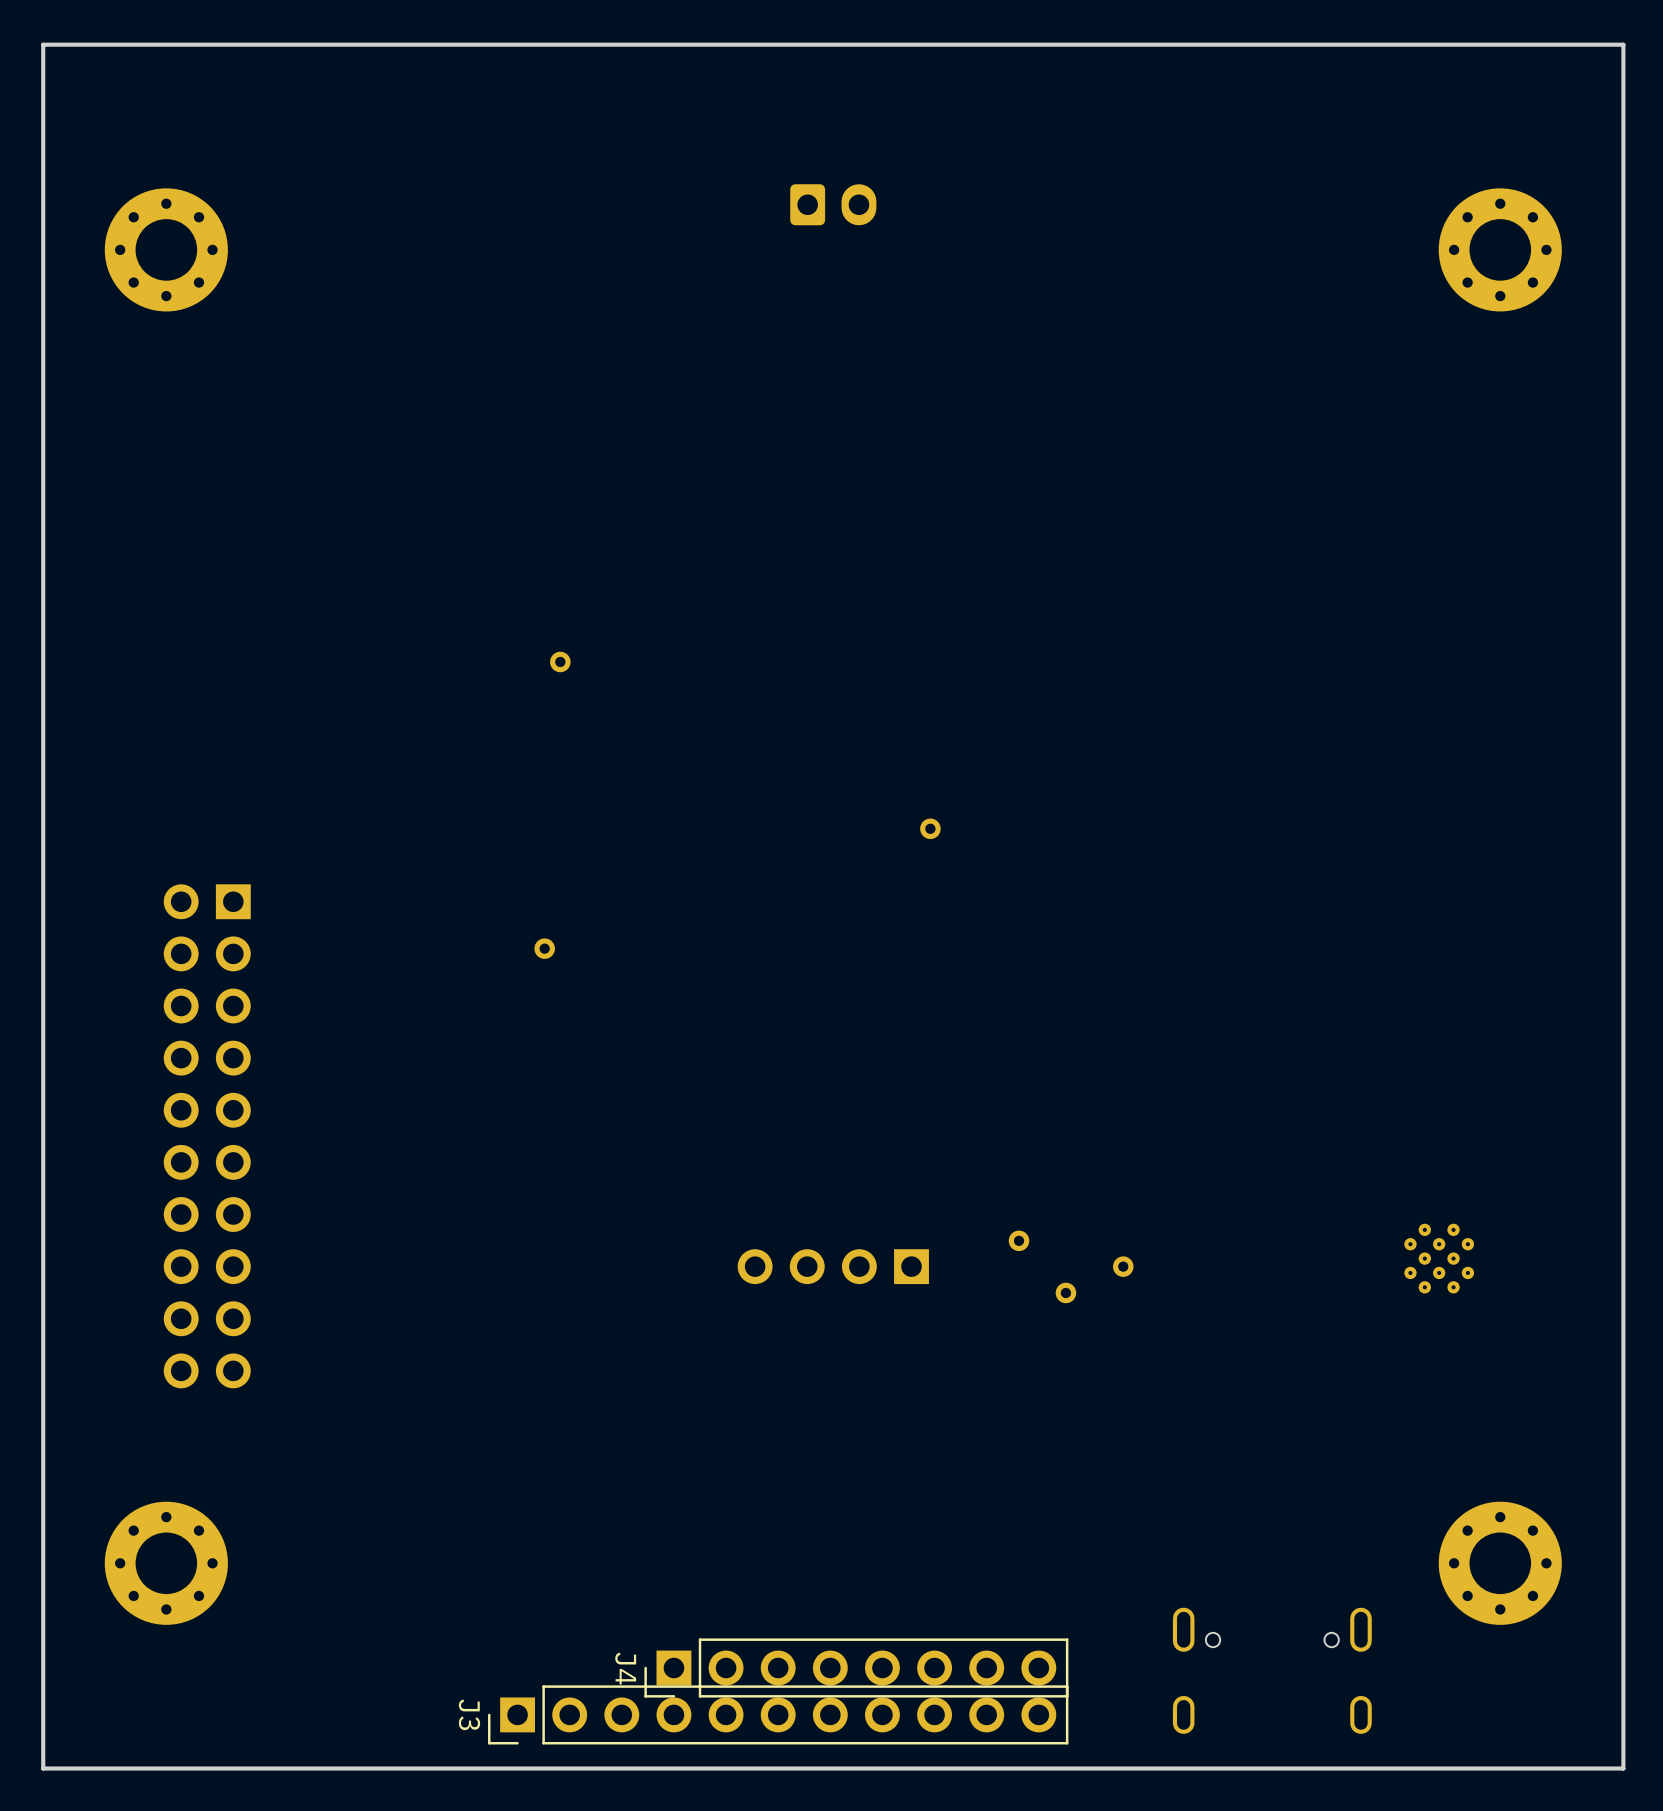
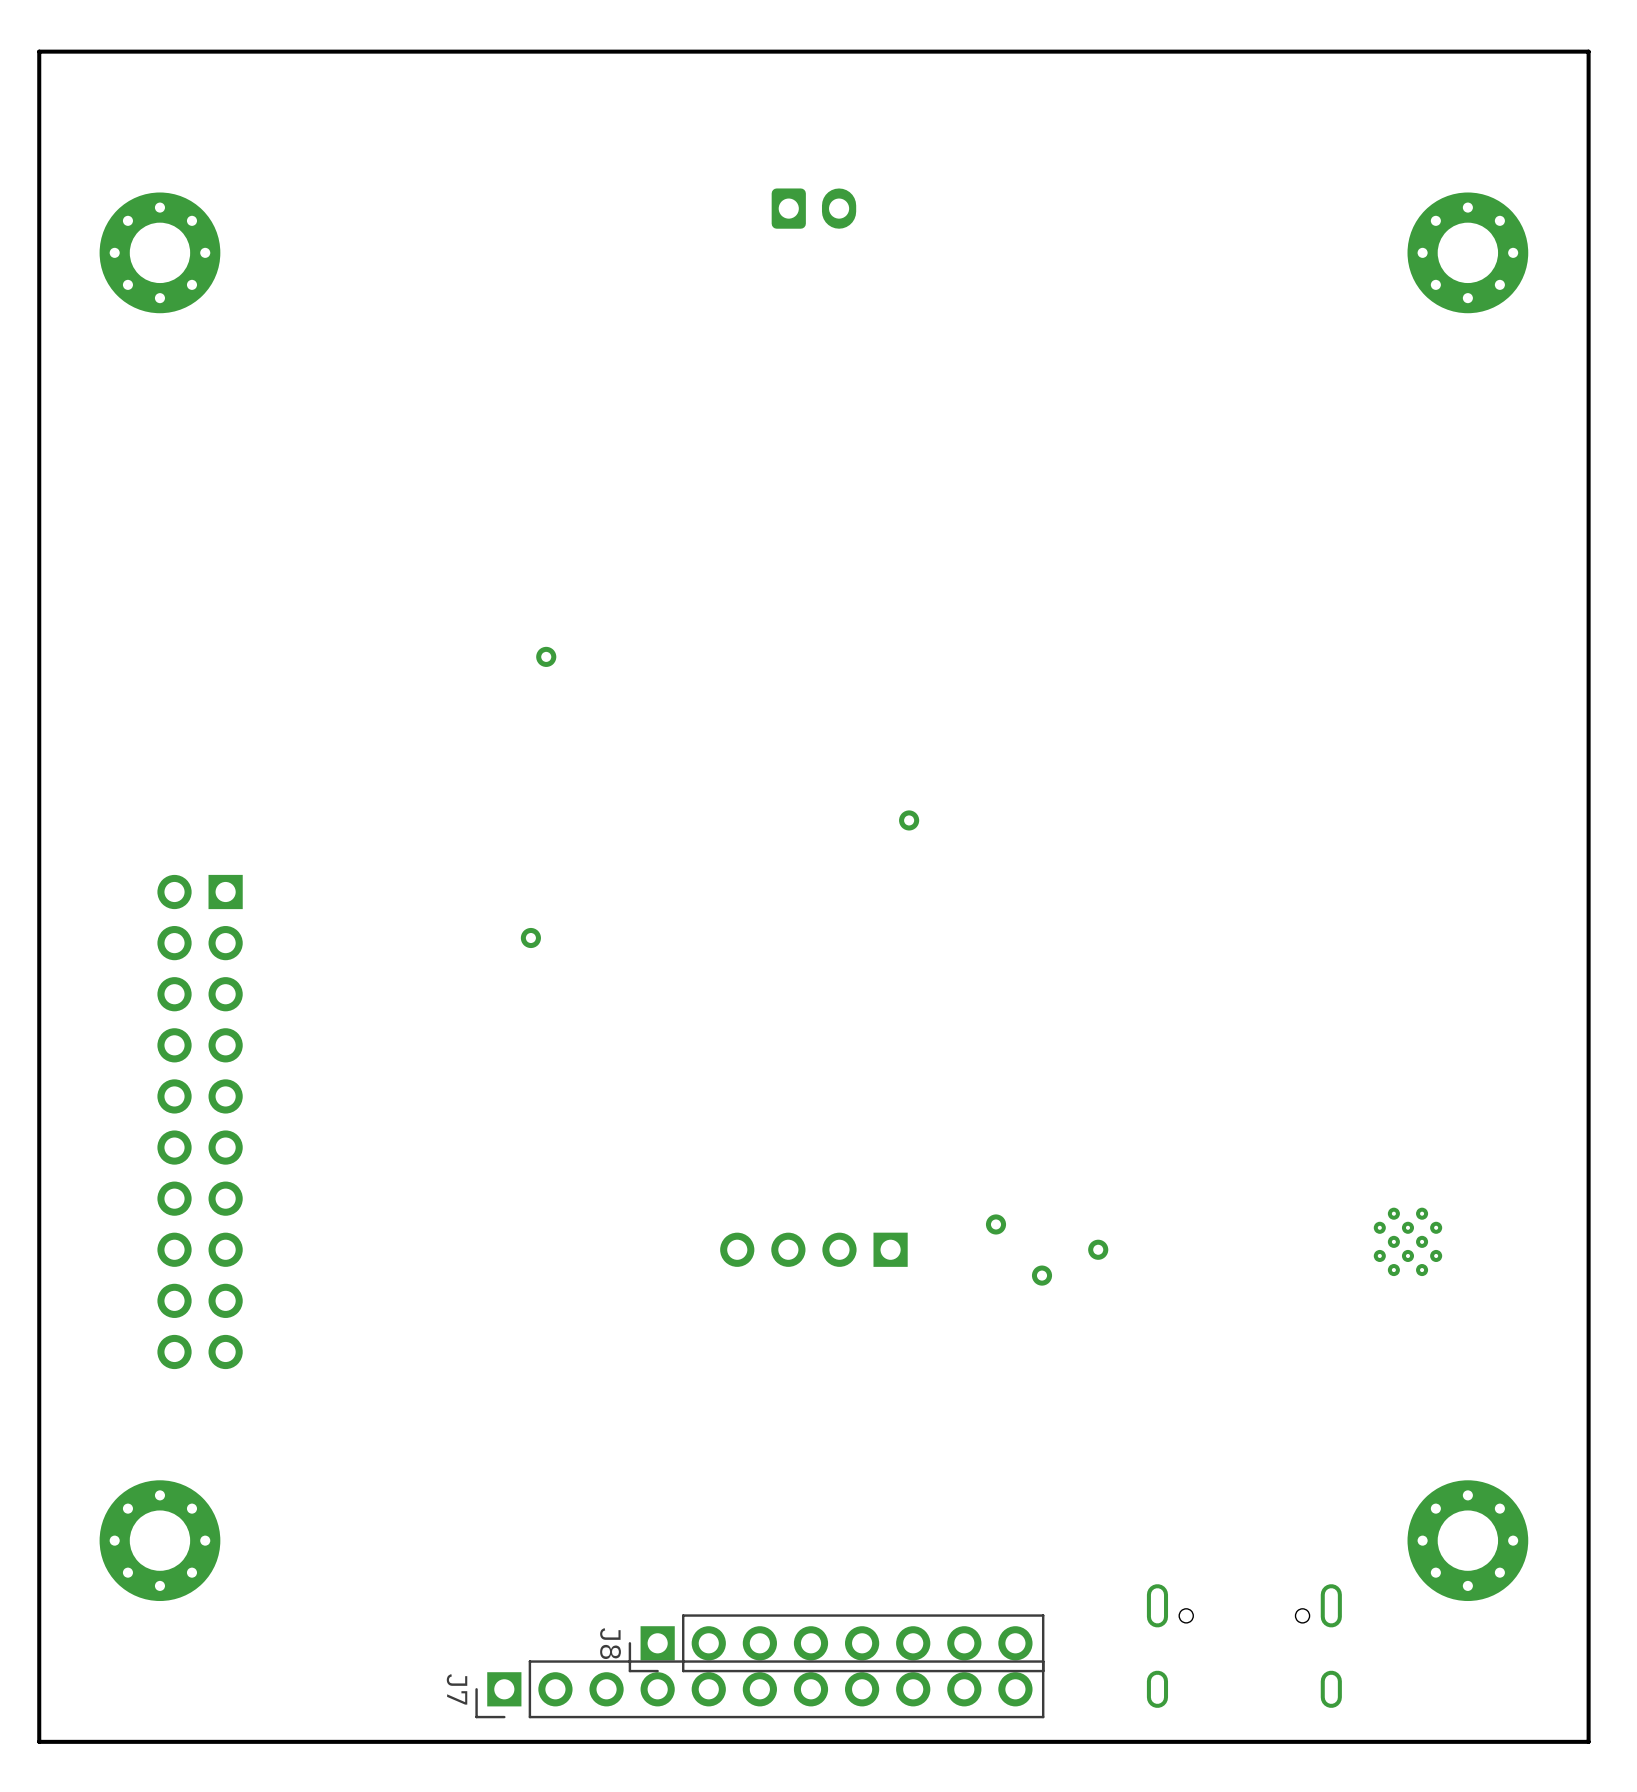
J4 name: J4 (625, 1668) -> J8 (610, 1643)
J3 name: J3 (469, 1714) -> J7 (457, 1689)

